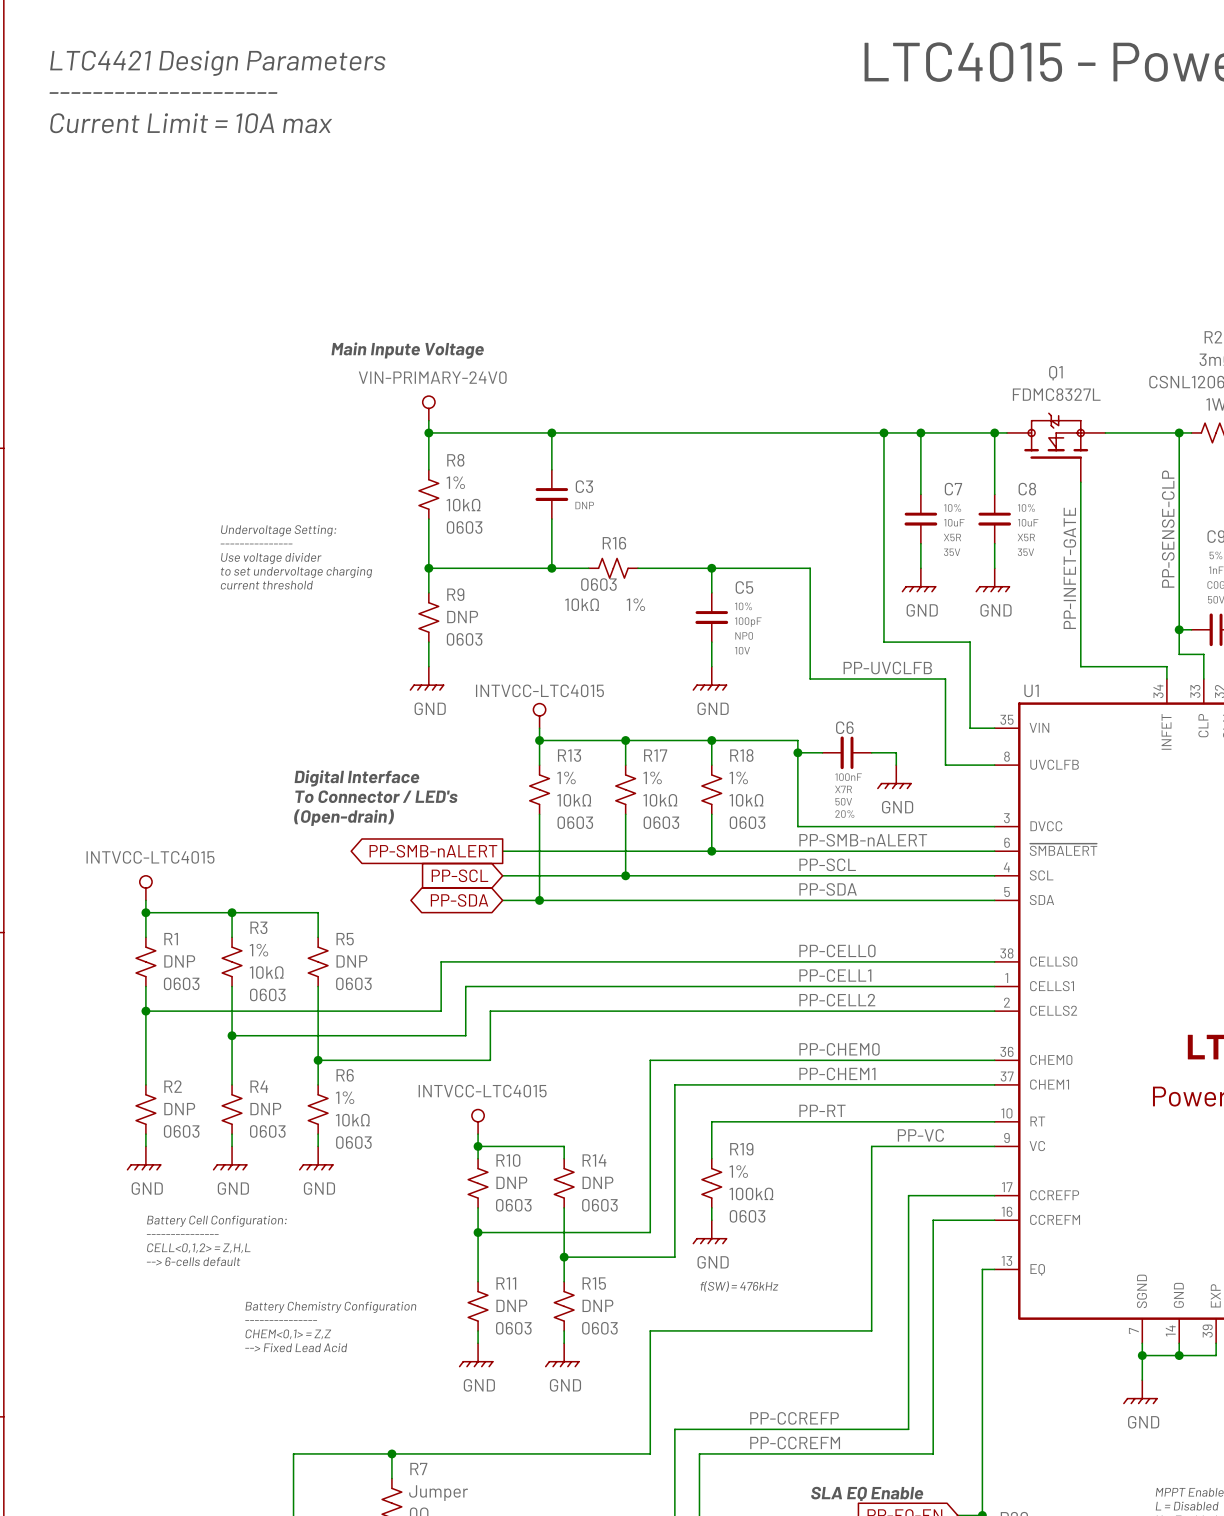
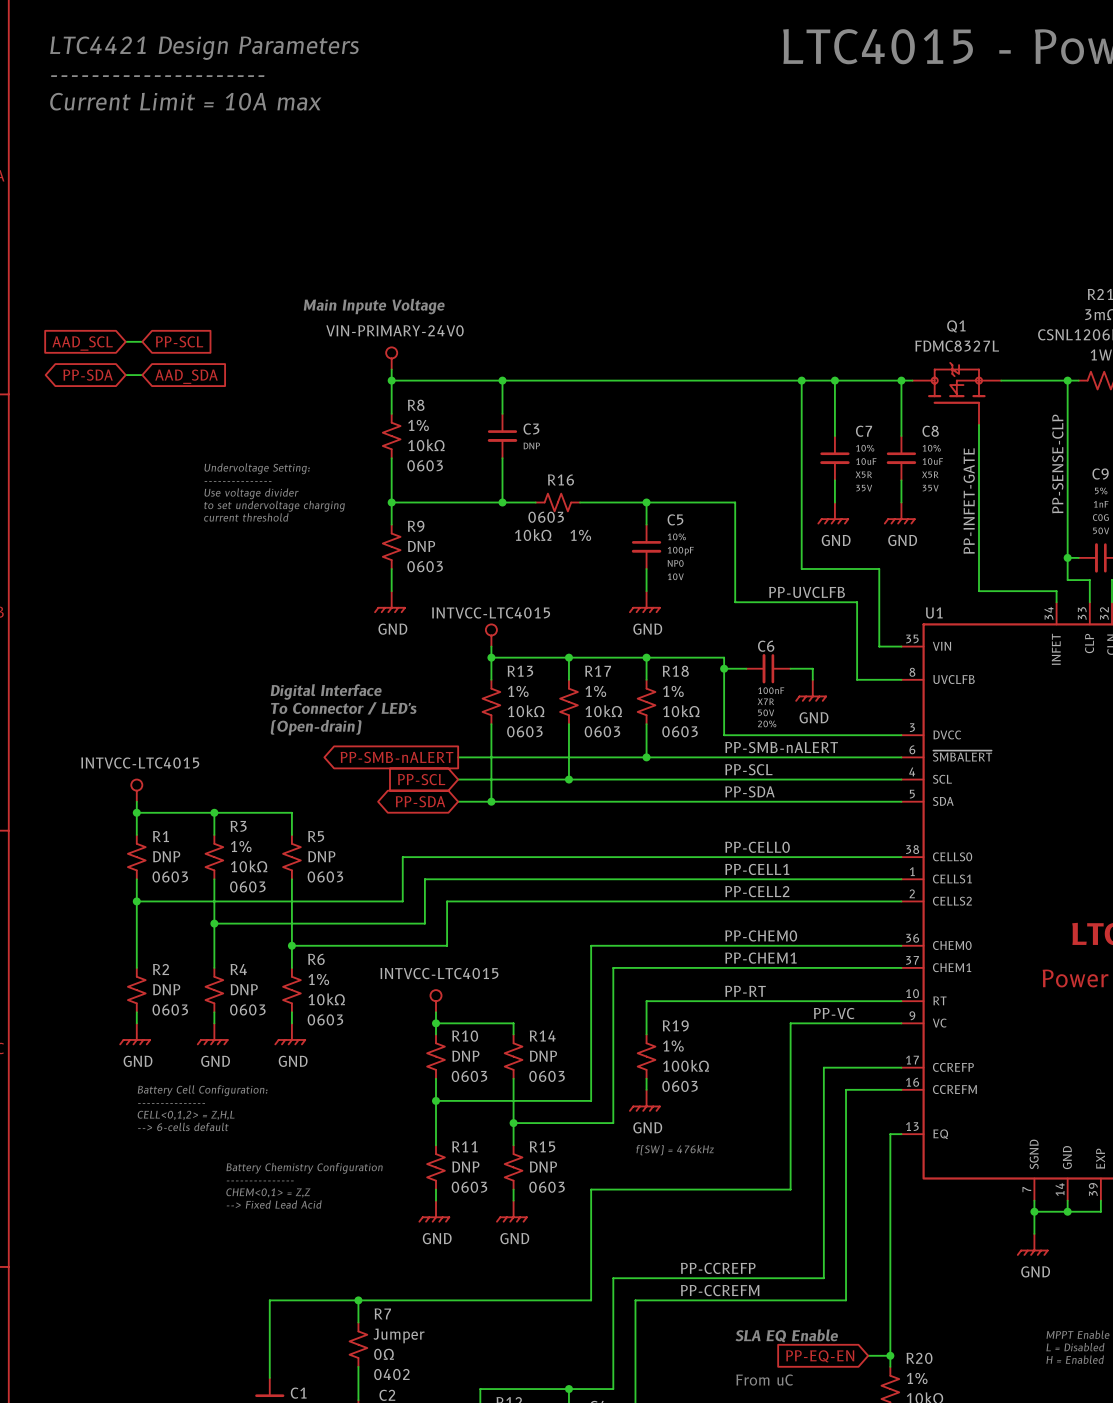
global label: none -> AAD_SCL (82, 343)
wire: none -> (125, 341) (142, 341)
global label: none -> PP-SCL (179, 341)
global label: none -> PP-SDA (88, 375)
wire: none -> (125, 375) (142, 375)
global label: none -> AAD_SDA (186, 376)

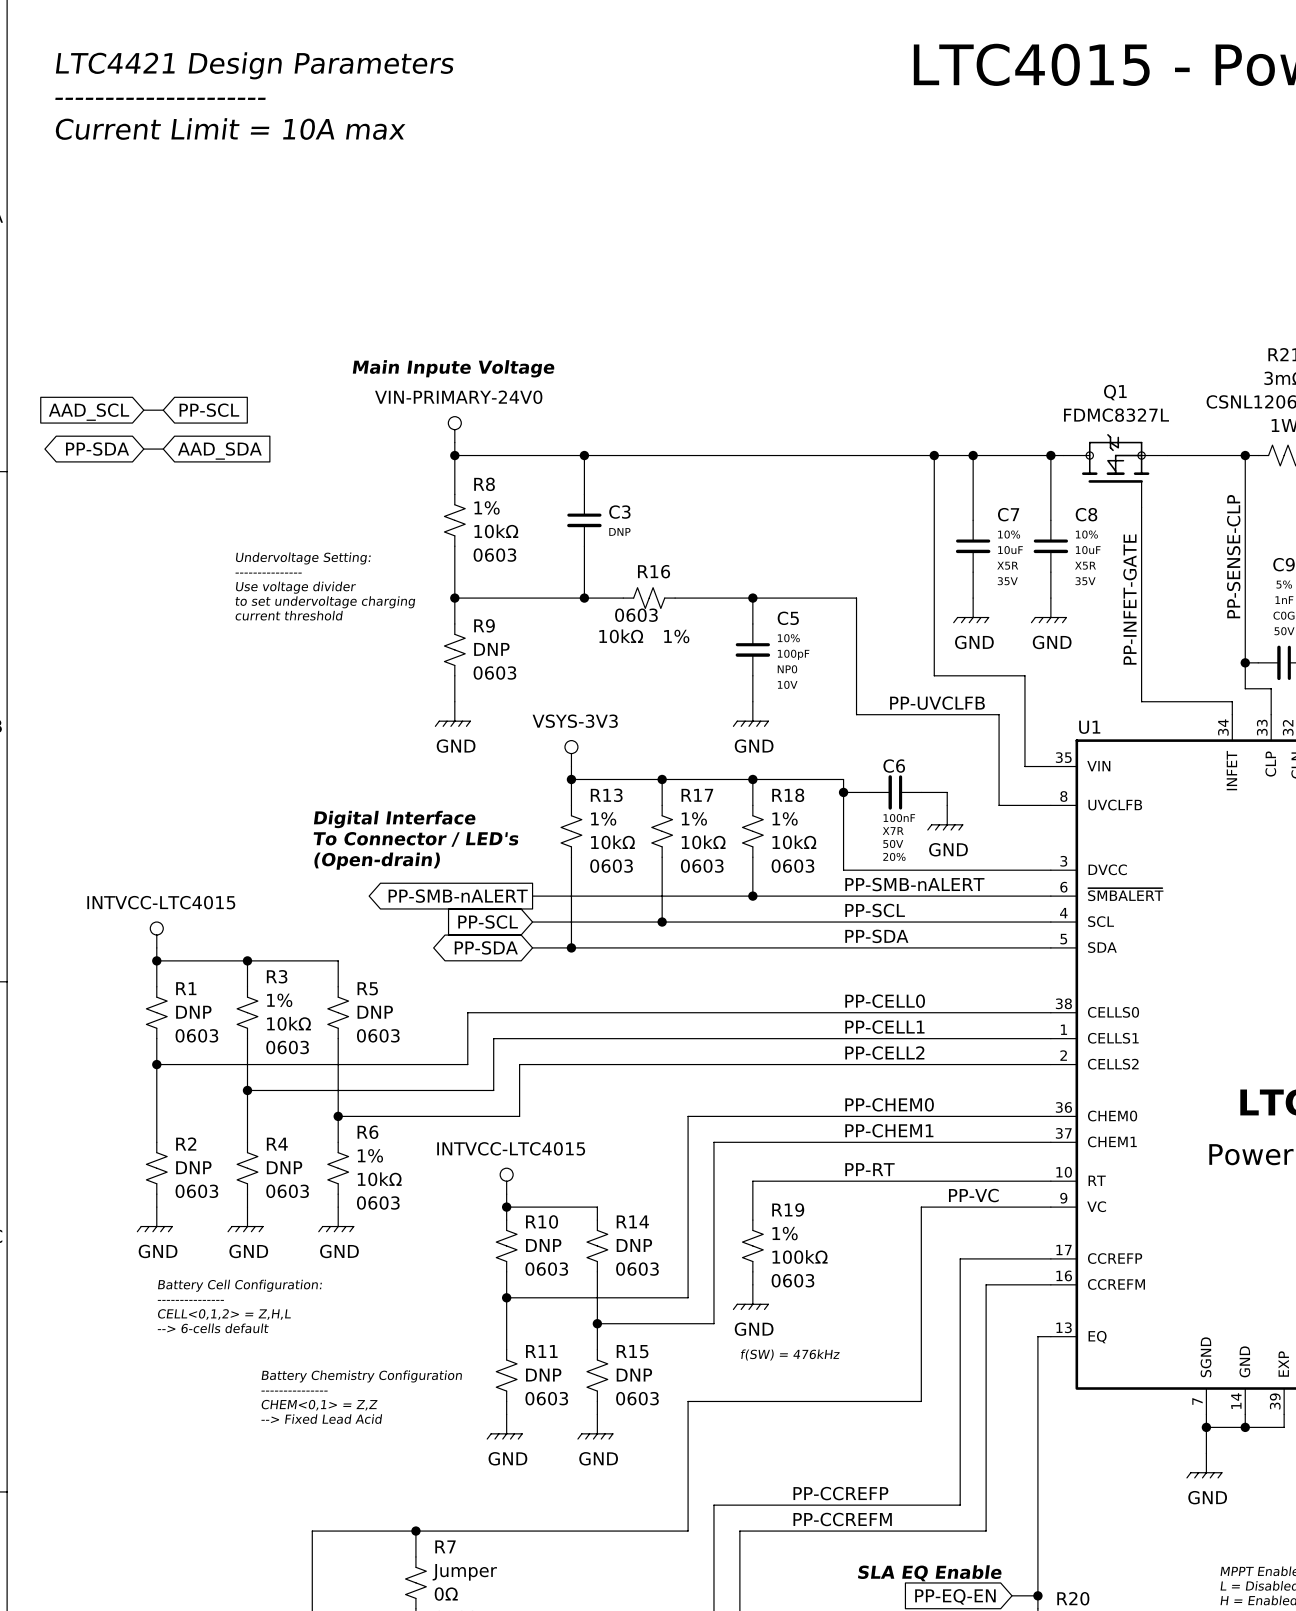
power symbol: INTVCC-LTC4015 (491, 635) -> VSYS-3V3 (571, 753)

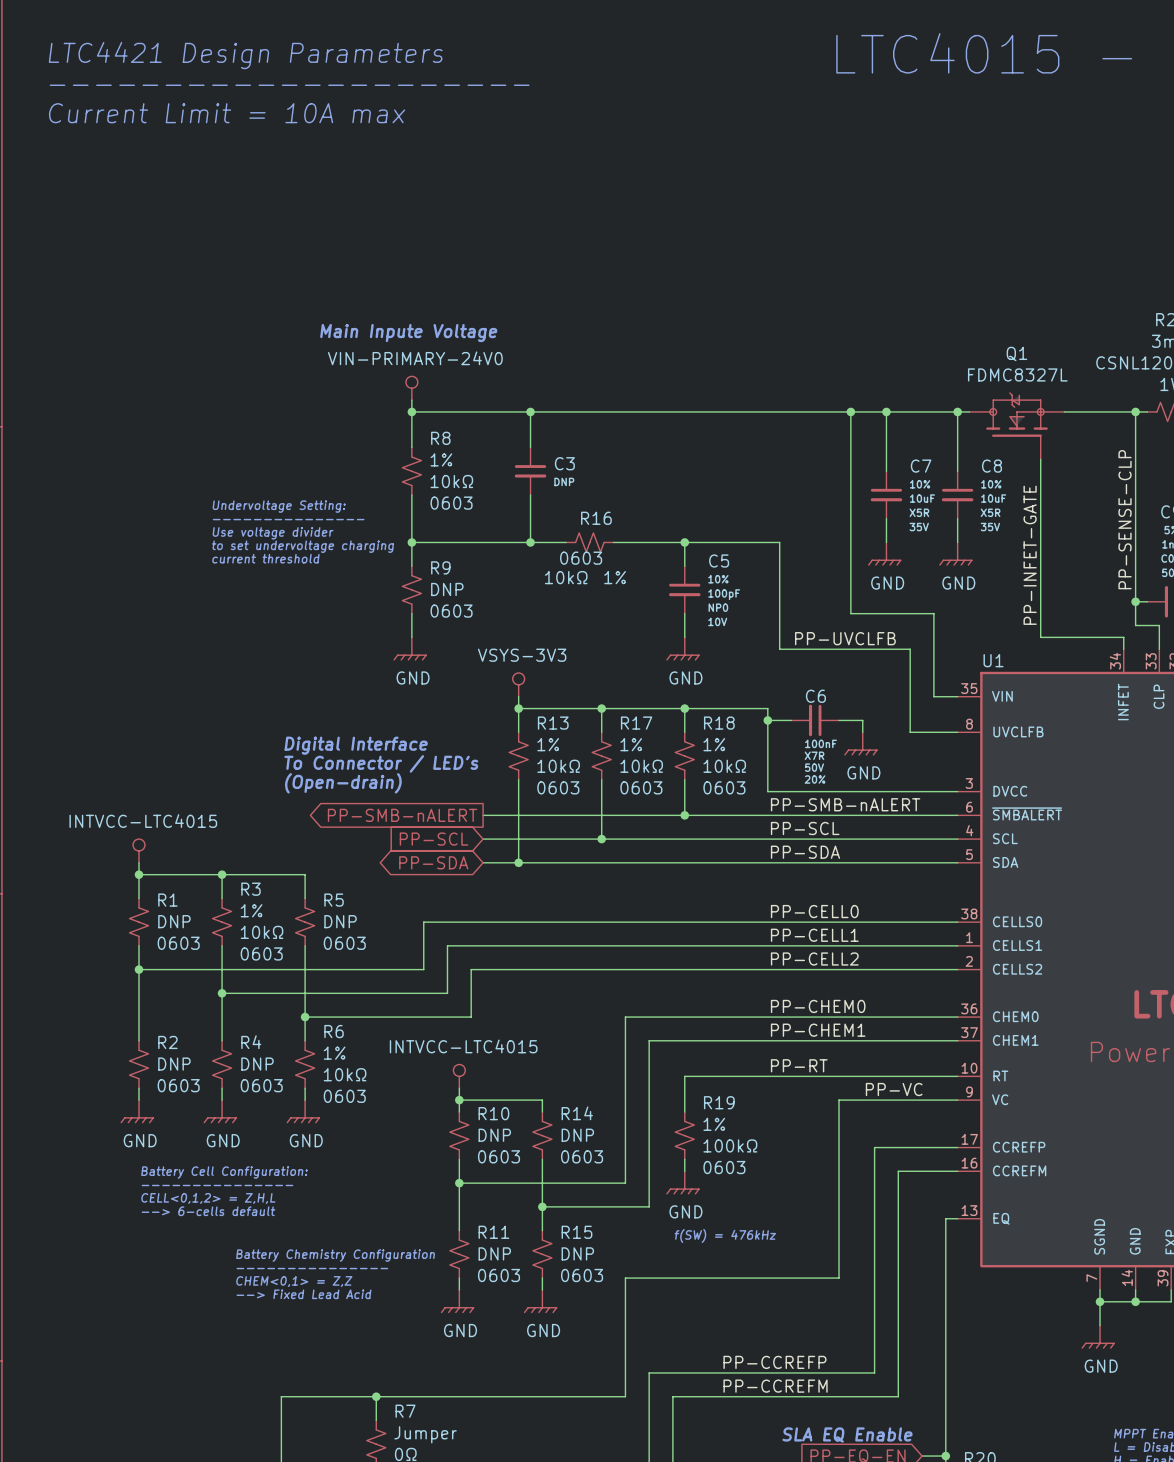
wire: (143, 410) (163, 410) -> none
global label: PP-SCL (209, 410) -> none
global label: AAD_SCL (89, 412) -> none
global label: PP-SDA (97, 449) -> none
wire: (143, 449) (163, 449) -> none
global label: AAD_SDA (219, 451) -> none

